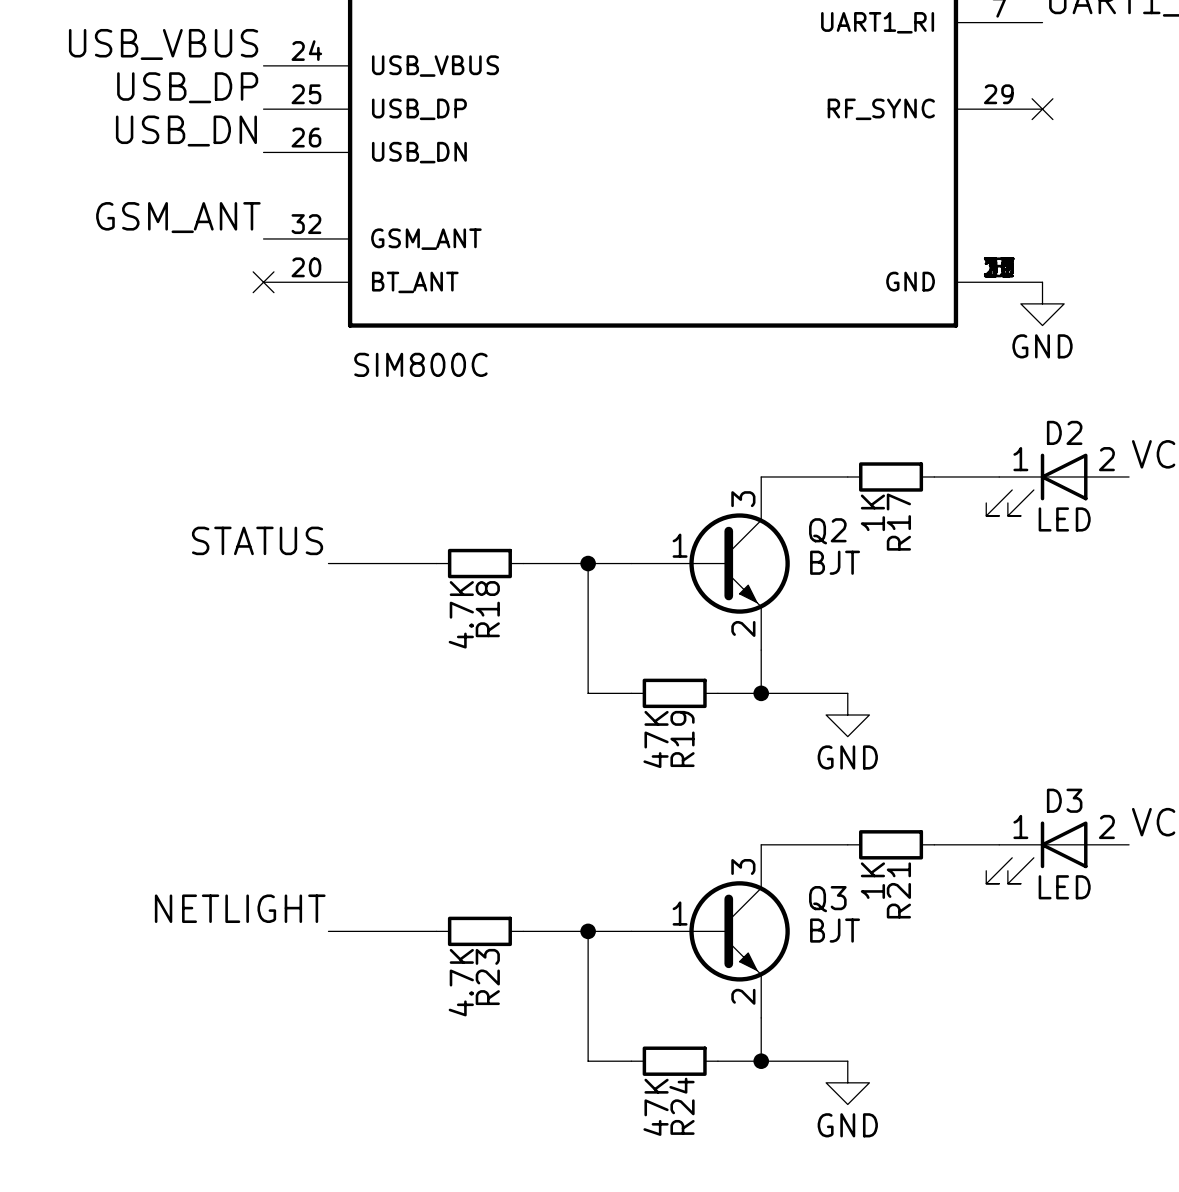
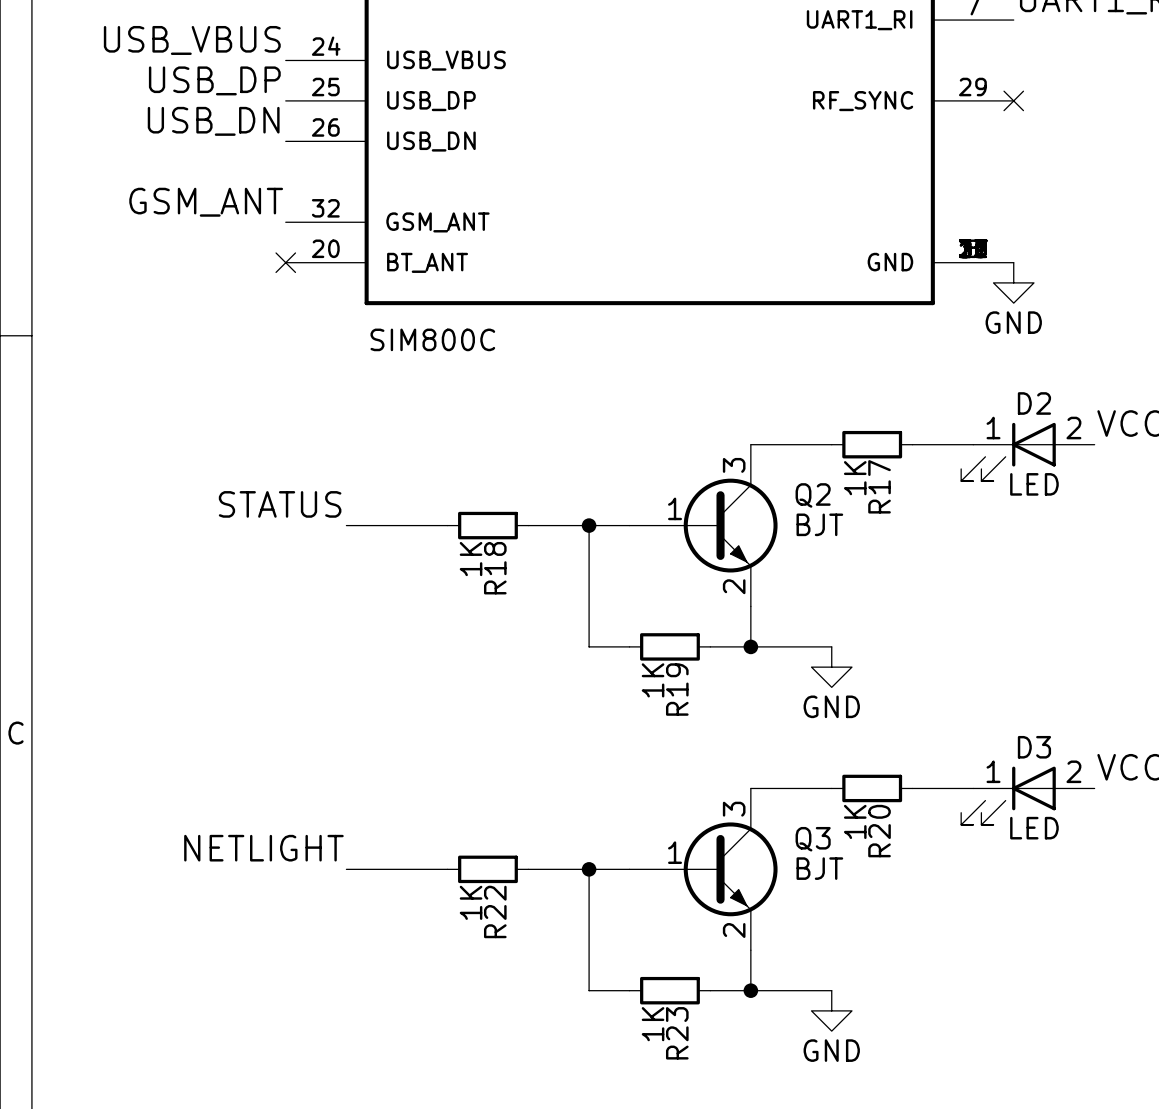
R18 value: 4.7K (461, 614) -> 1K (471, 559)
R19 value: 47K (656, 739) -> 1K (653, 680)
R21 name: R21 (898, 890) -> R20 (879, 831)
R23 name: R23 (487, 976) -> R22 (495, 911)
R23 value: 4.7K (461, 982) -> 1K (471, 902)
R24 name: R24 (682, 1106) -> R23 (677, 1033)
R24 value: 47K (656, 1107) -> 1K (653, 1024)

